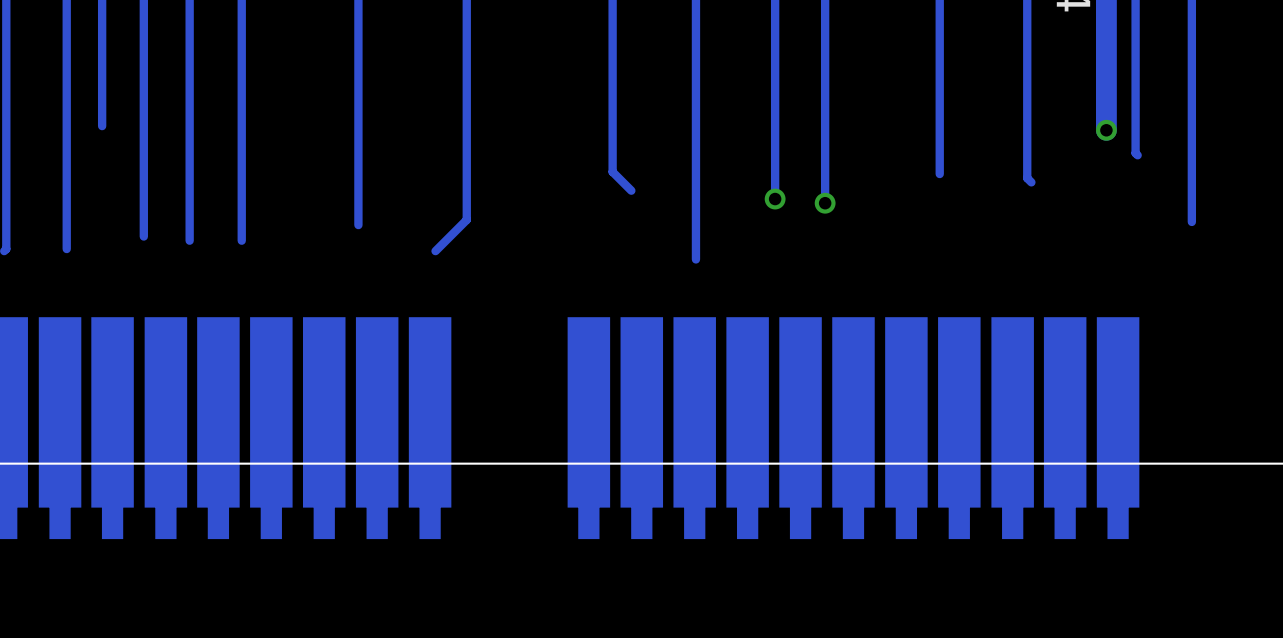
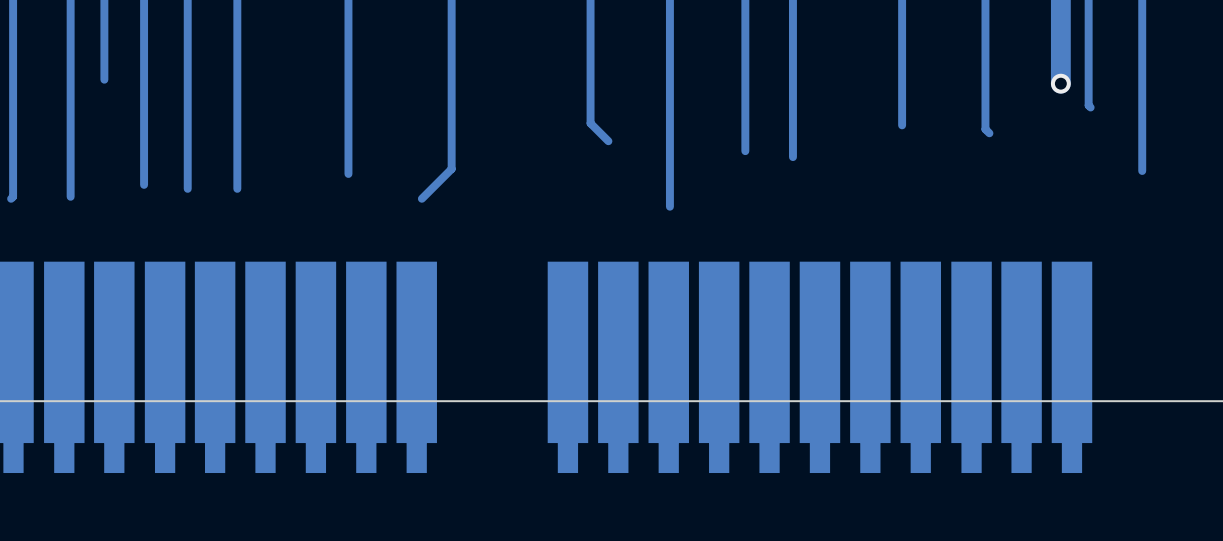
via: (775, 199) -> none
via: (825, 203) -> none

